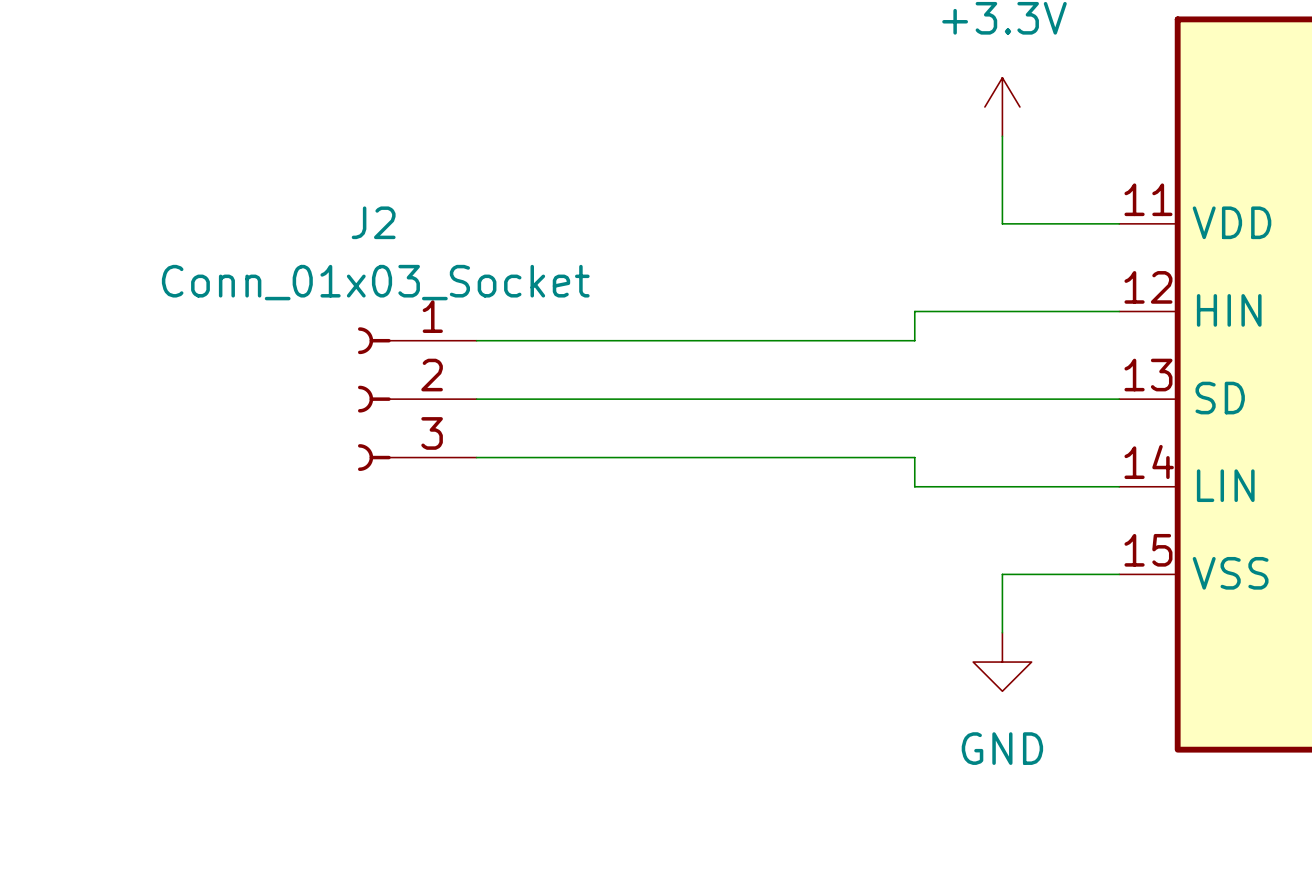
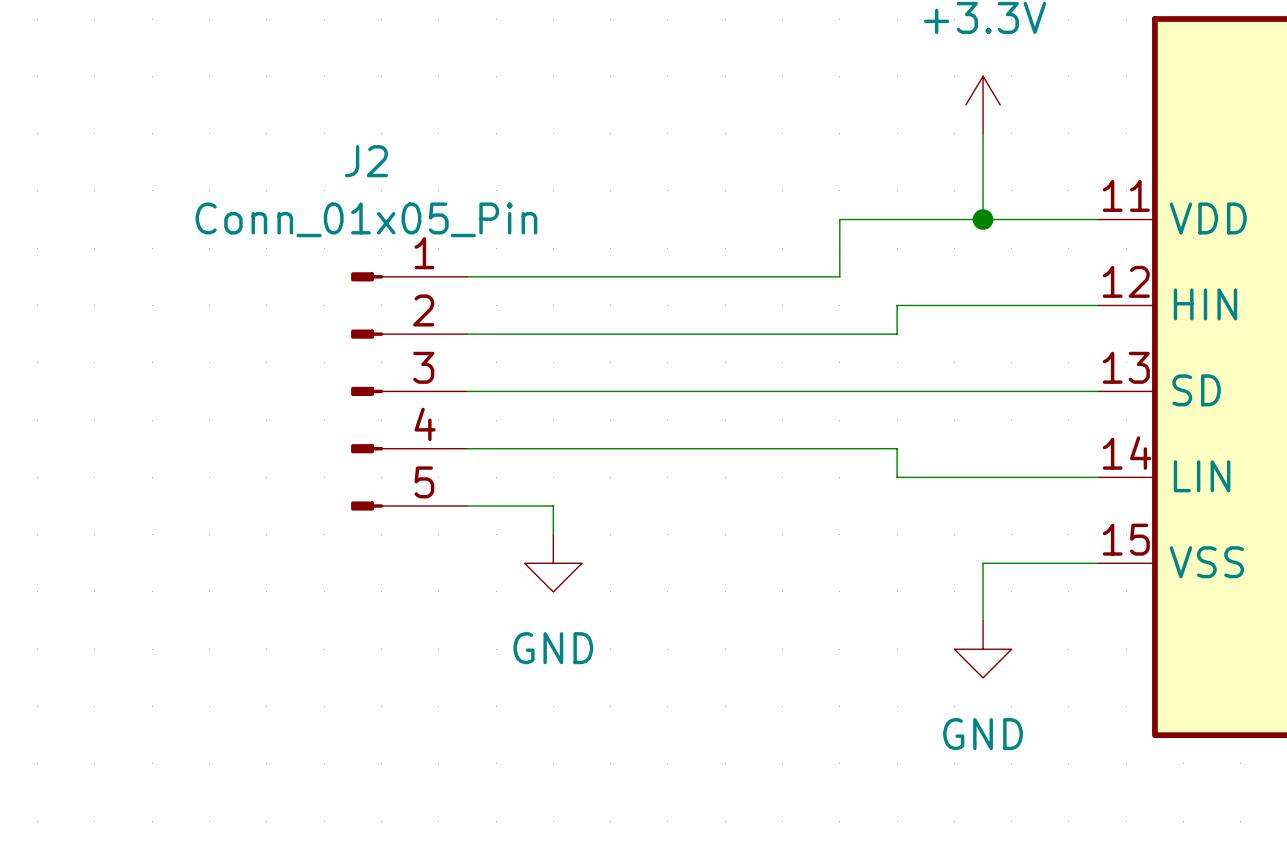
J2 name position: J2 (373, 222) -> J2 (366, 161)
wire: none -> (983, 219) (839, 219) (839, 276) (467, 276)
junction: none -> (983, 219)
J2 value: Conn_01x03_Socket (375, 282) -> Conn_01x05_Pin (366, 219)
J2 symbol: [358, 327, 477, 471] -> [351, 272, 468, 511]
wire: none -> (467, 506) (553, 506) (553, 534)
power symbol: none -> GND (553, 563)

